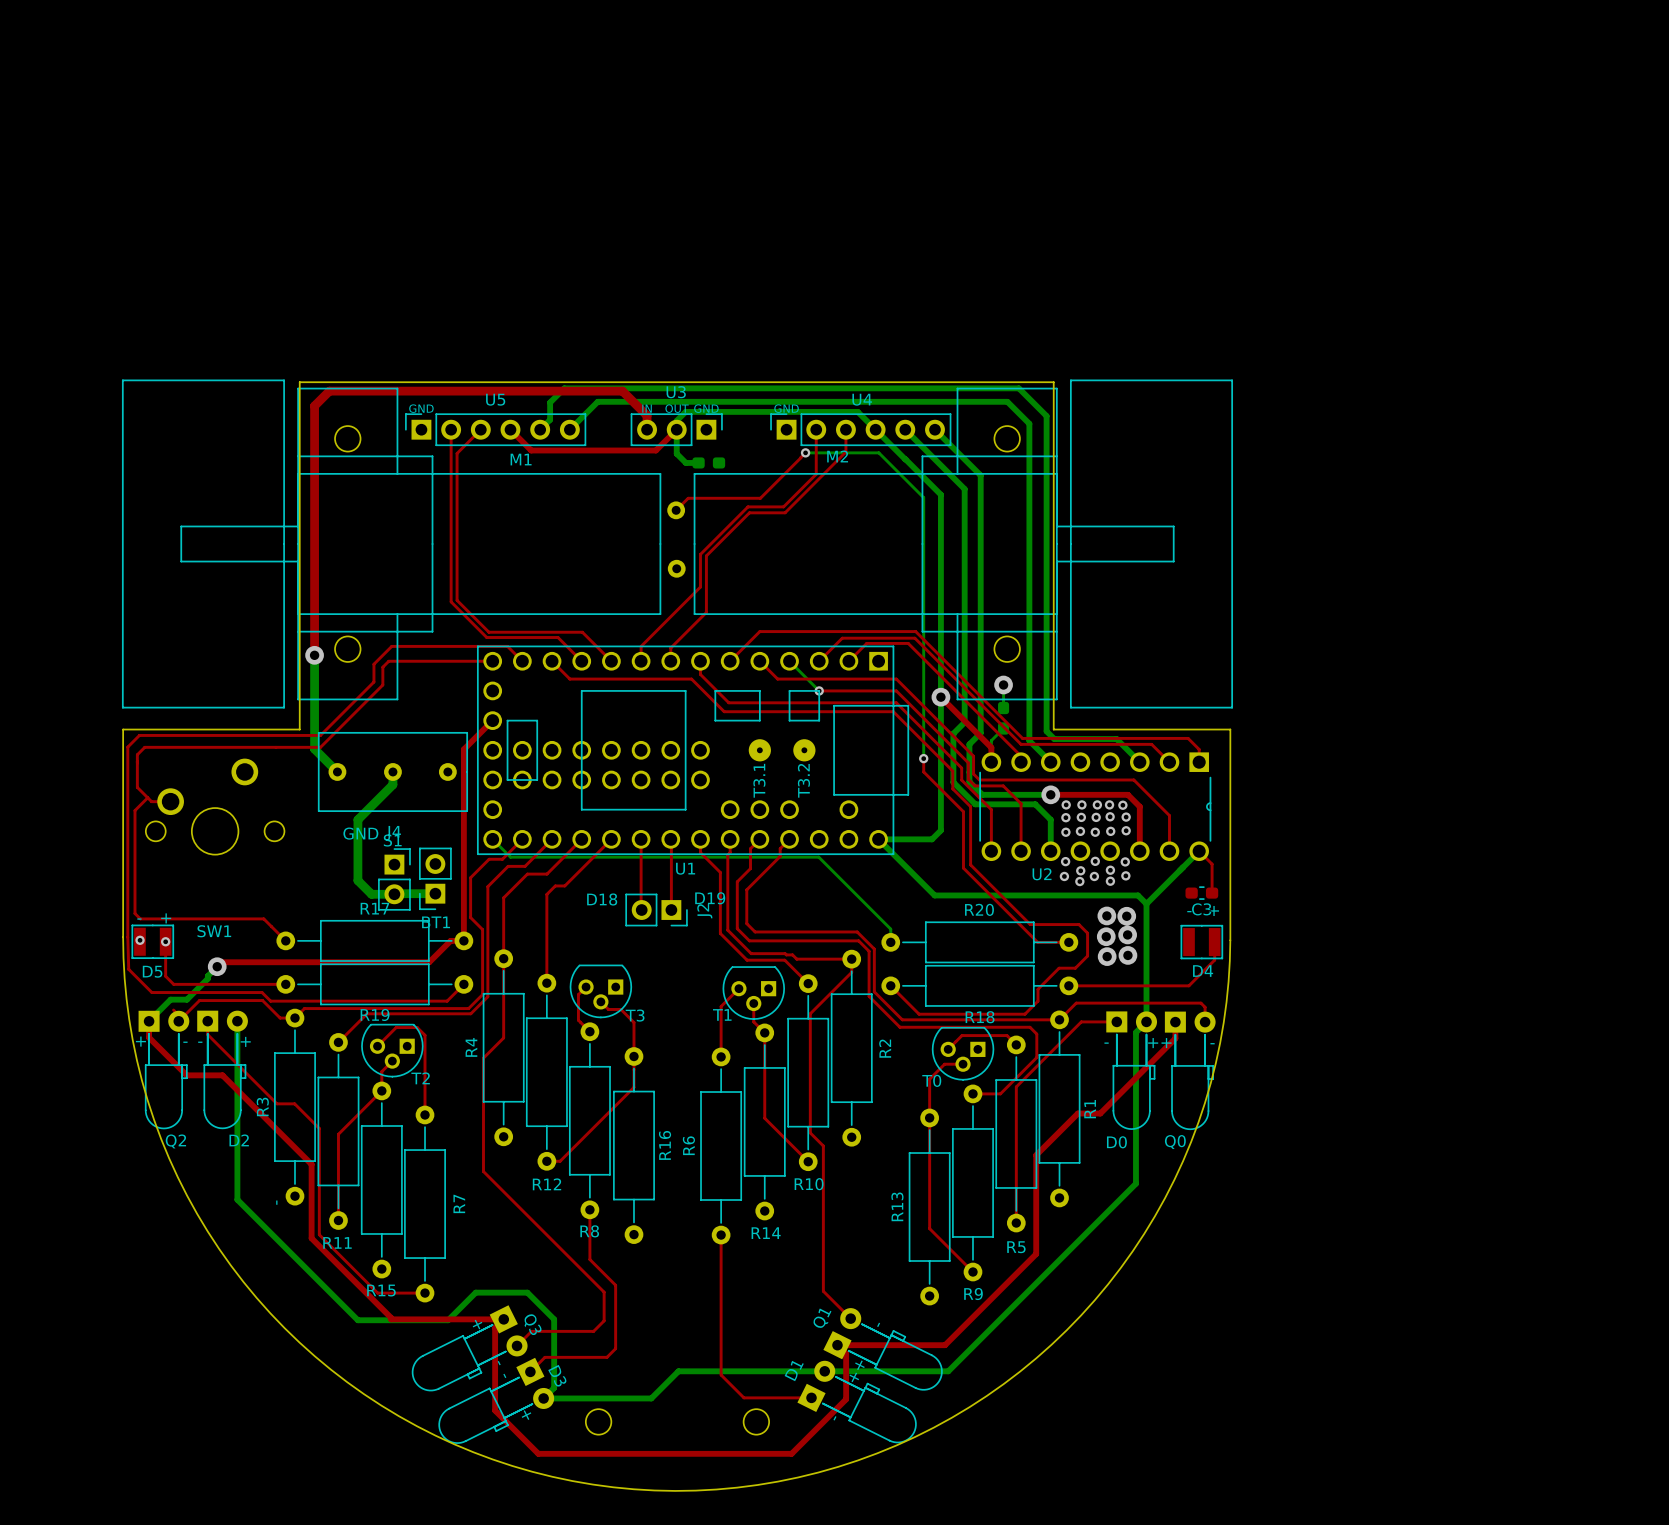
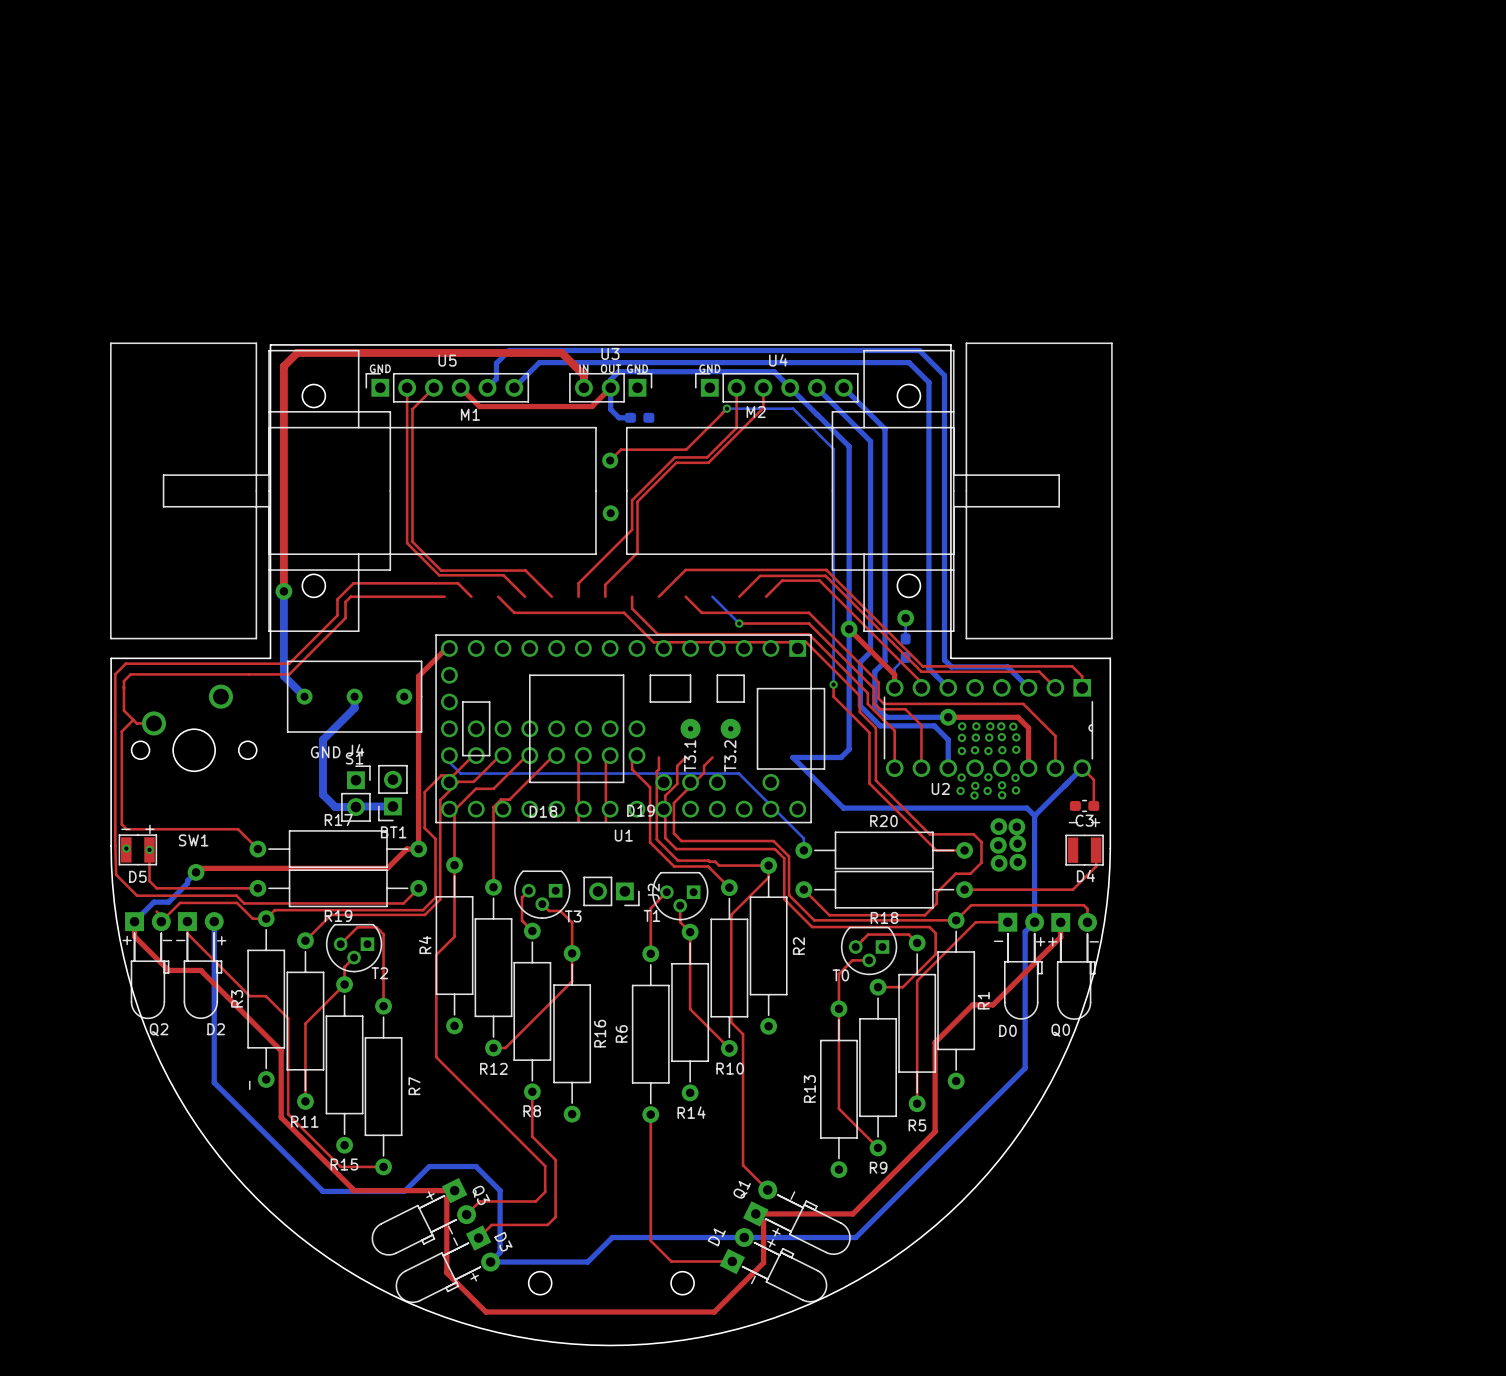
U1 position: (693, 750) -> (630, 728)
J2 position: (656, 910) -> (611, 891)

